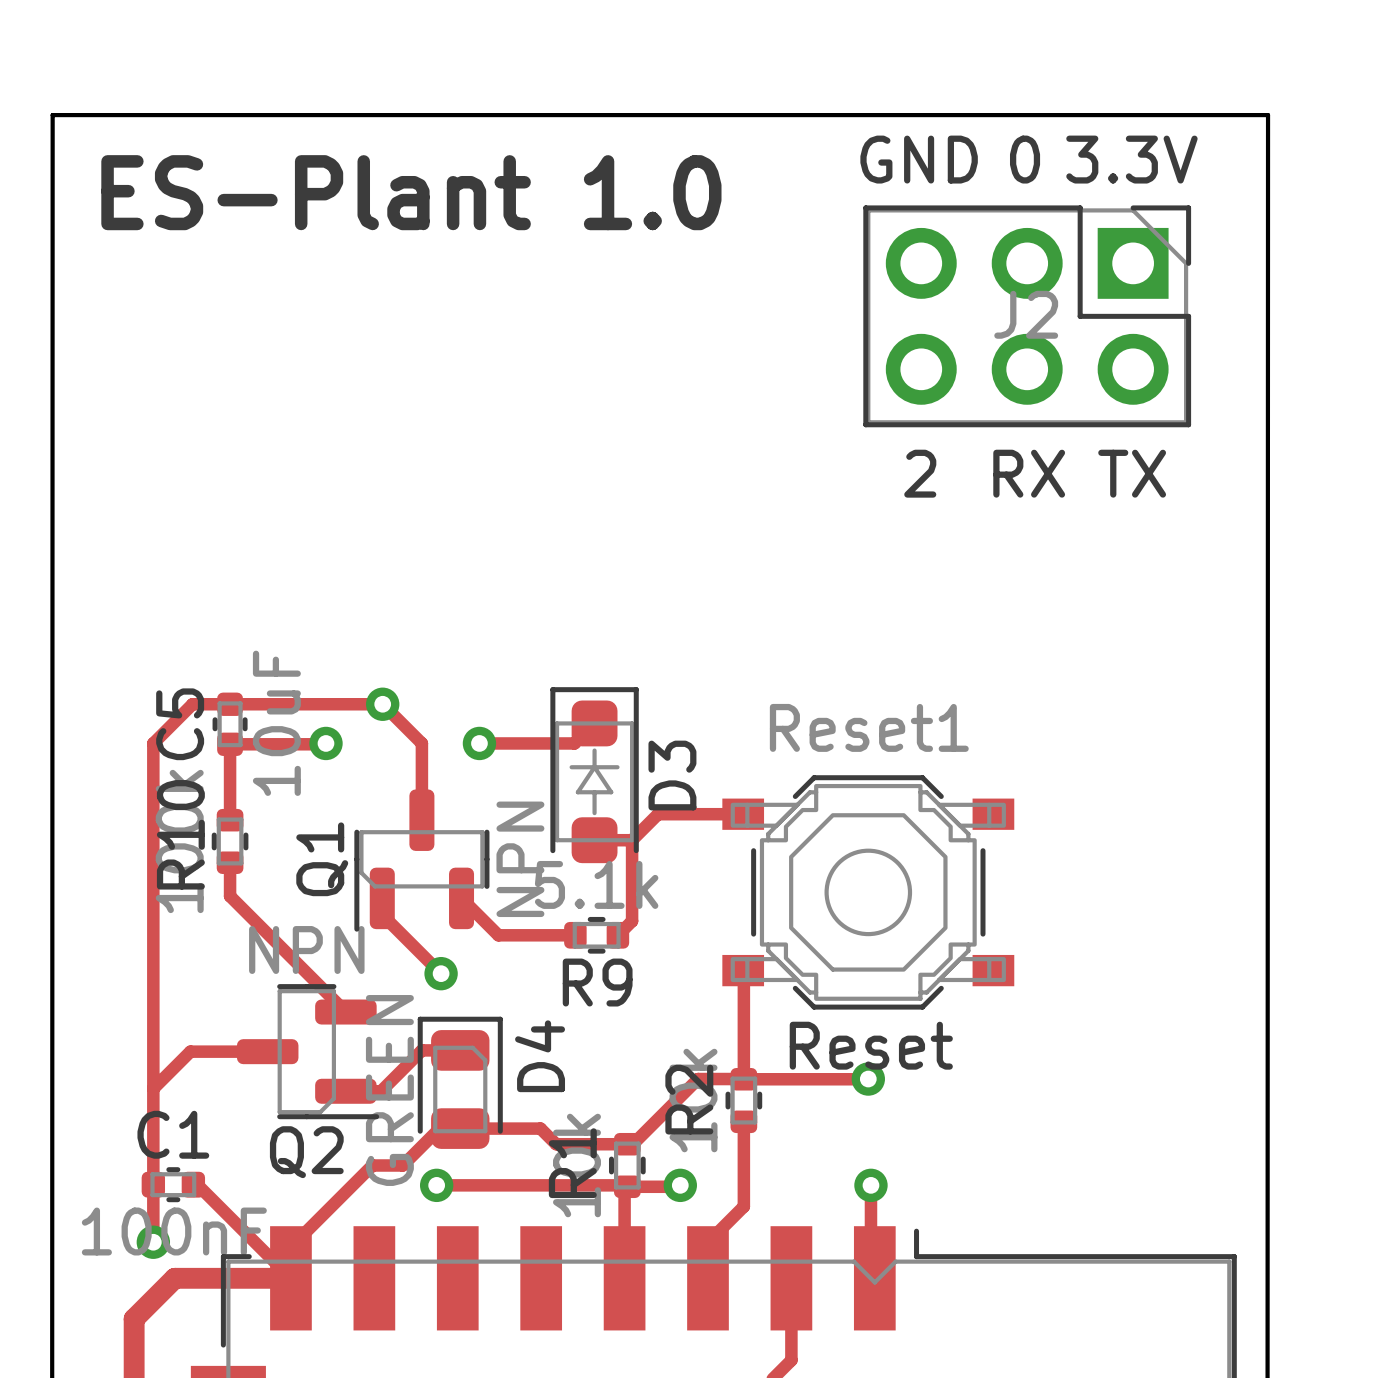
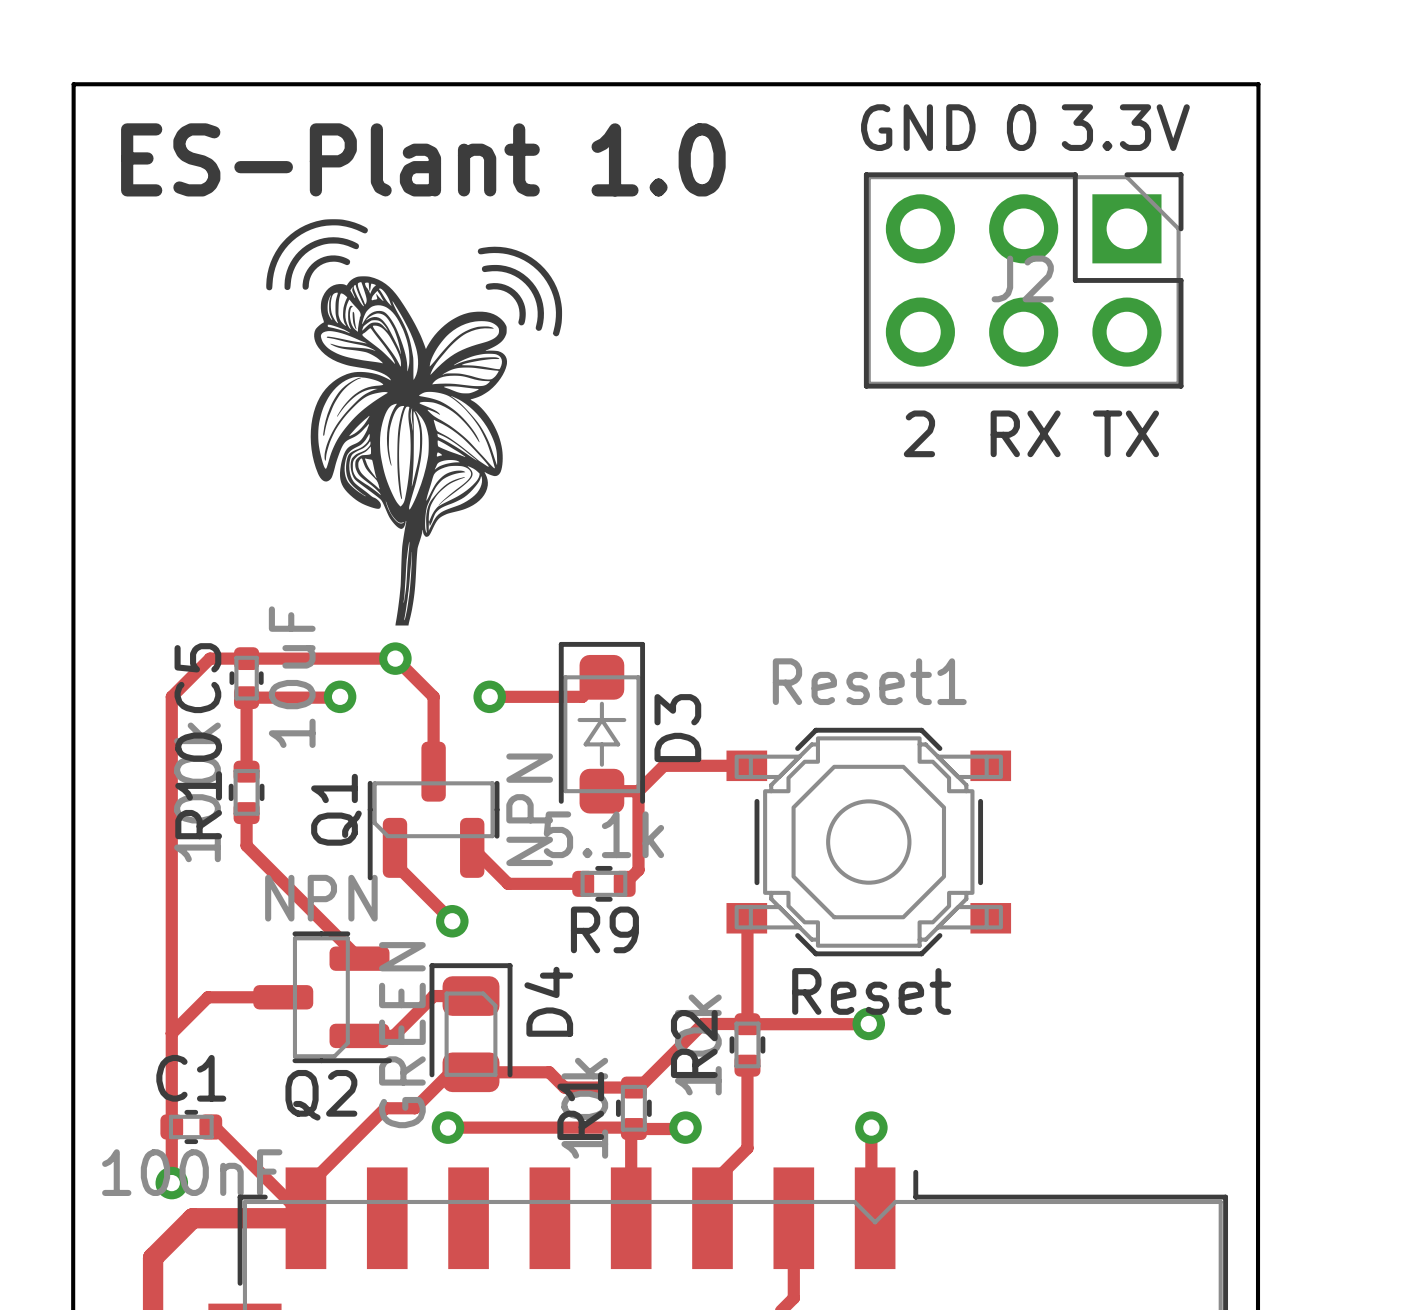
drawing: none -> [266, 219, 563, 626]

